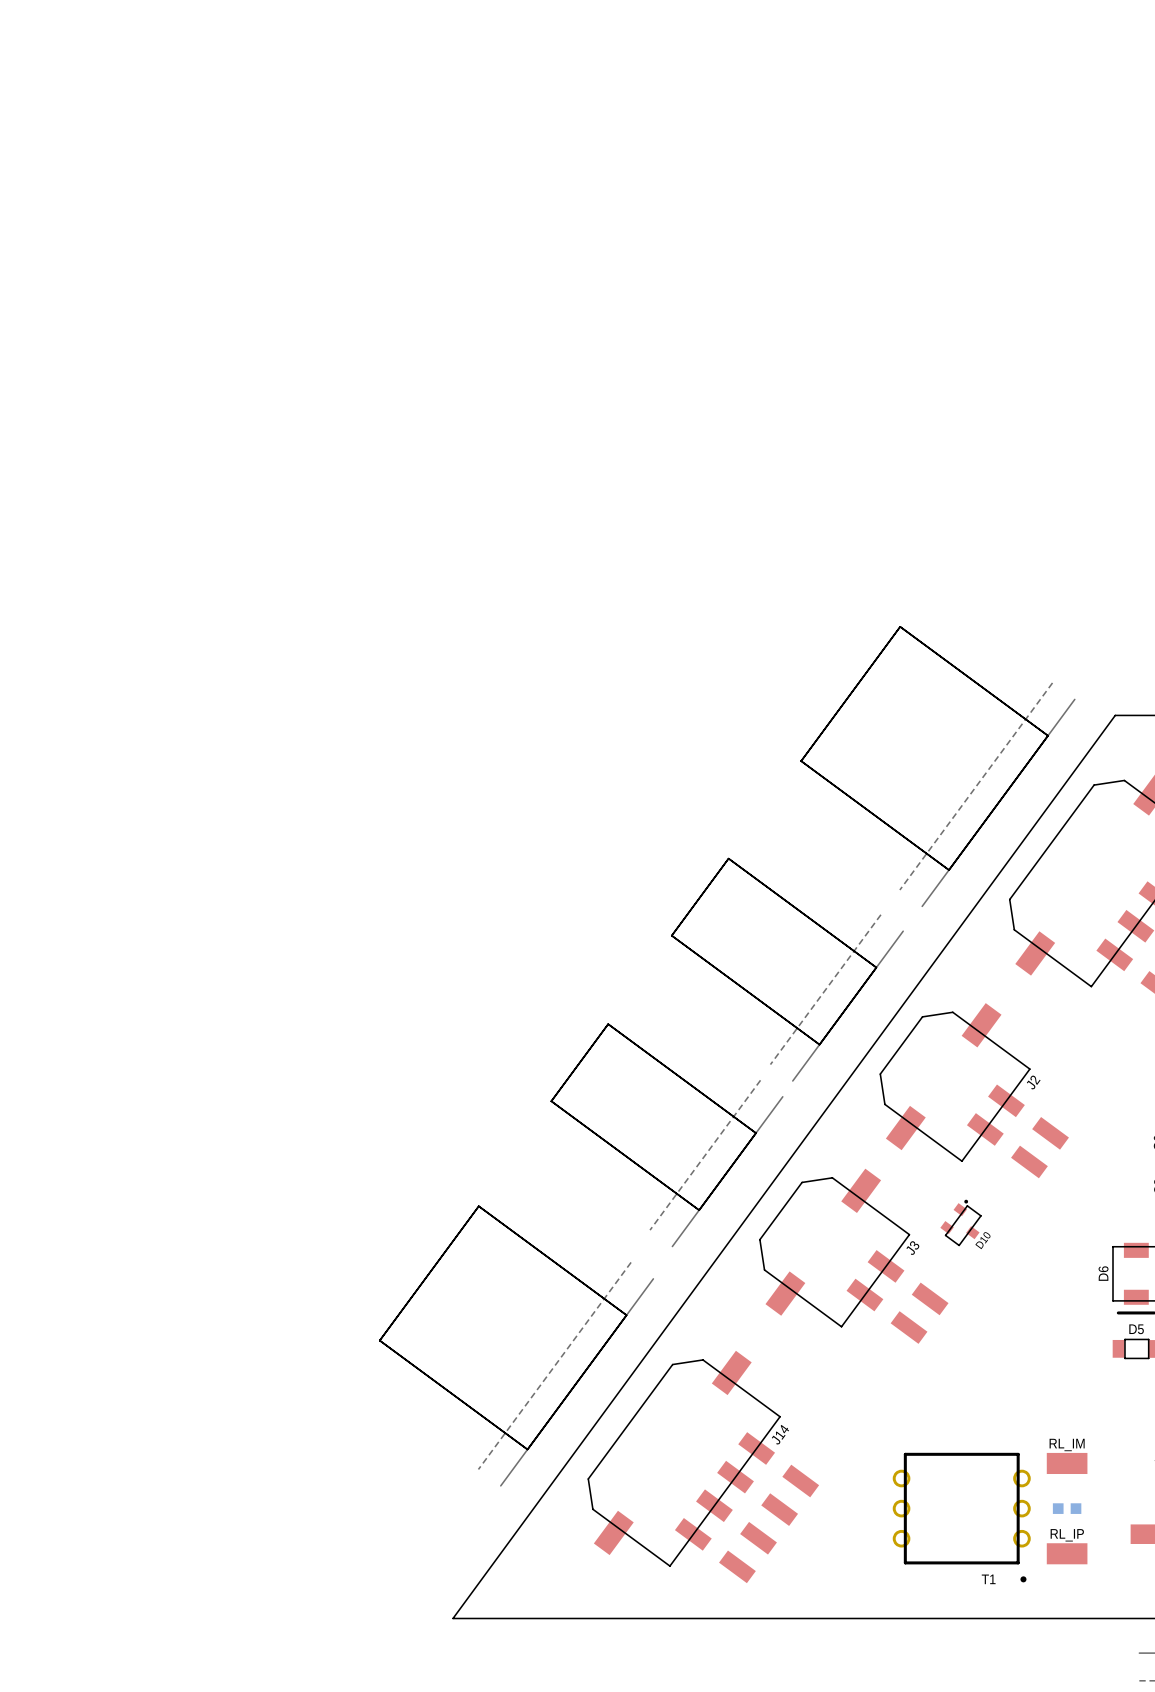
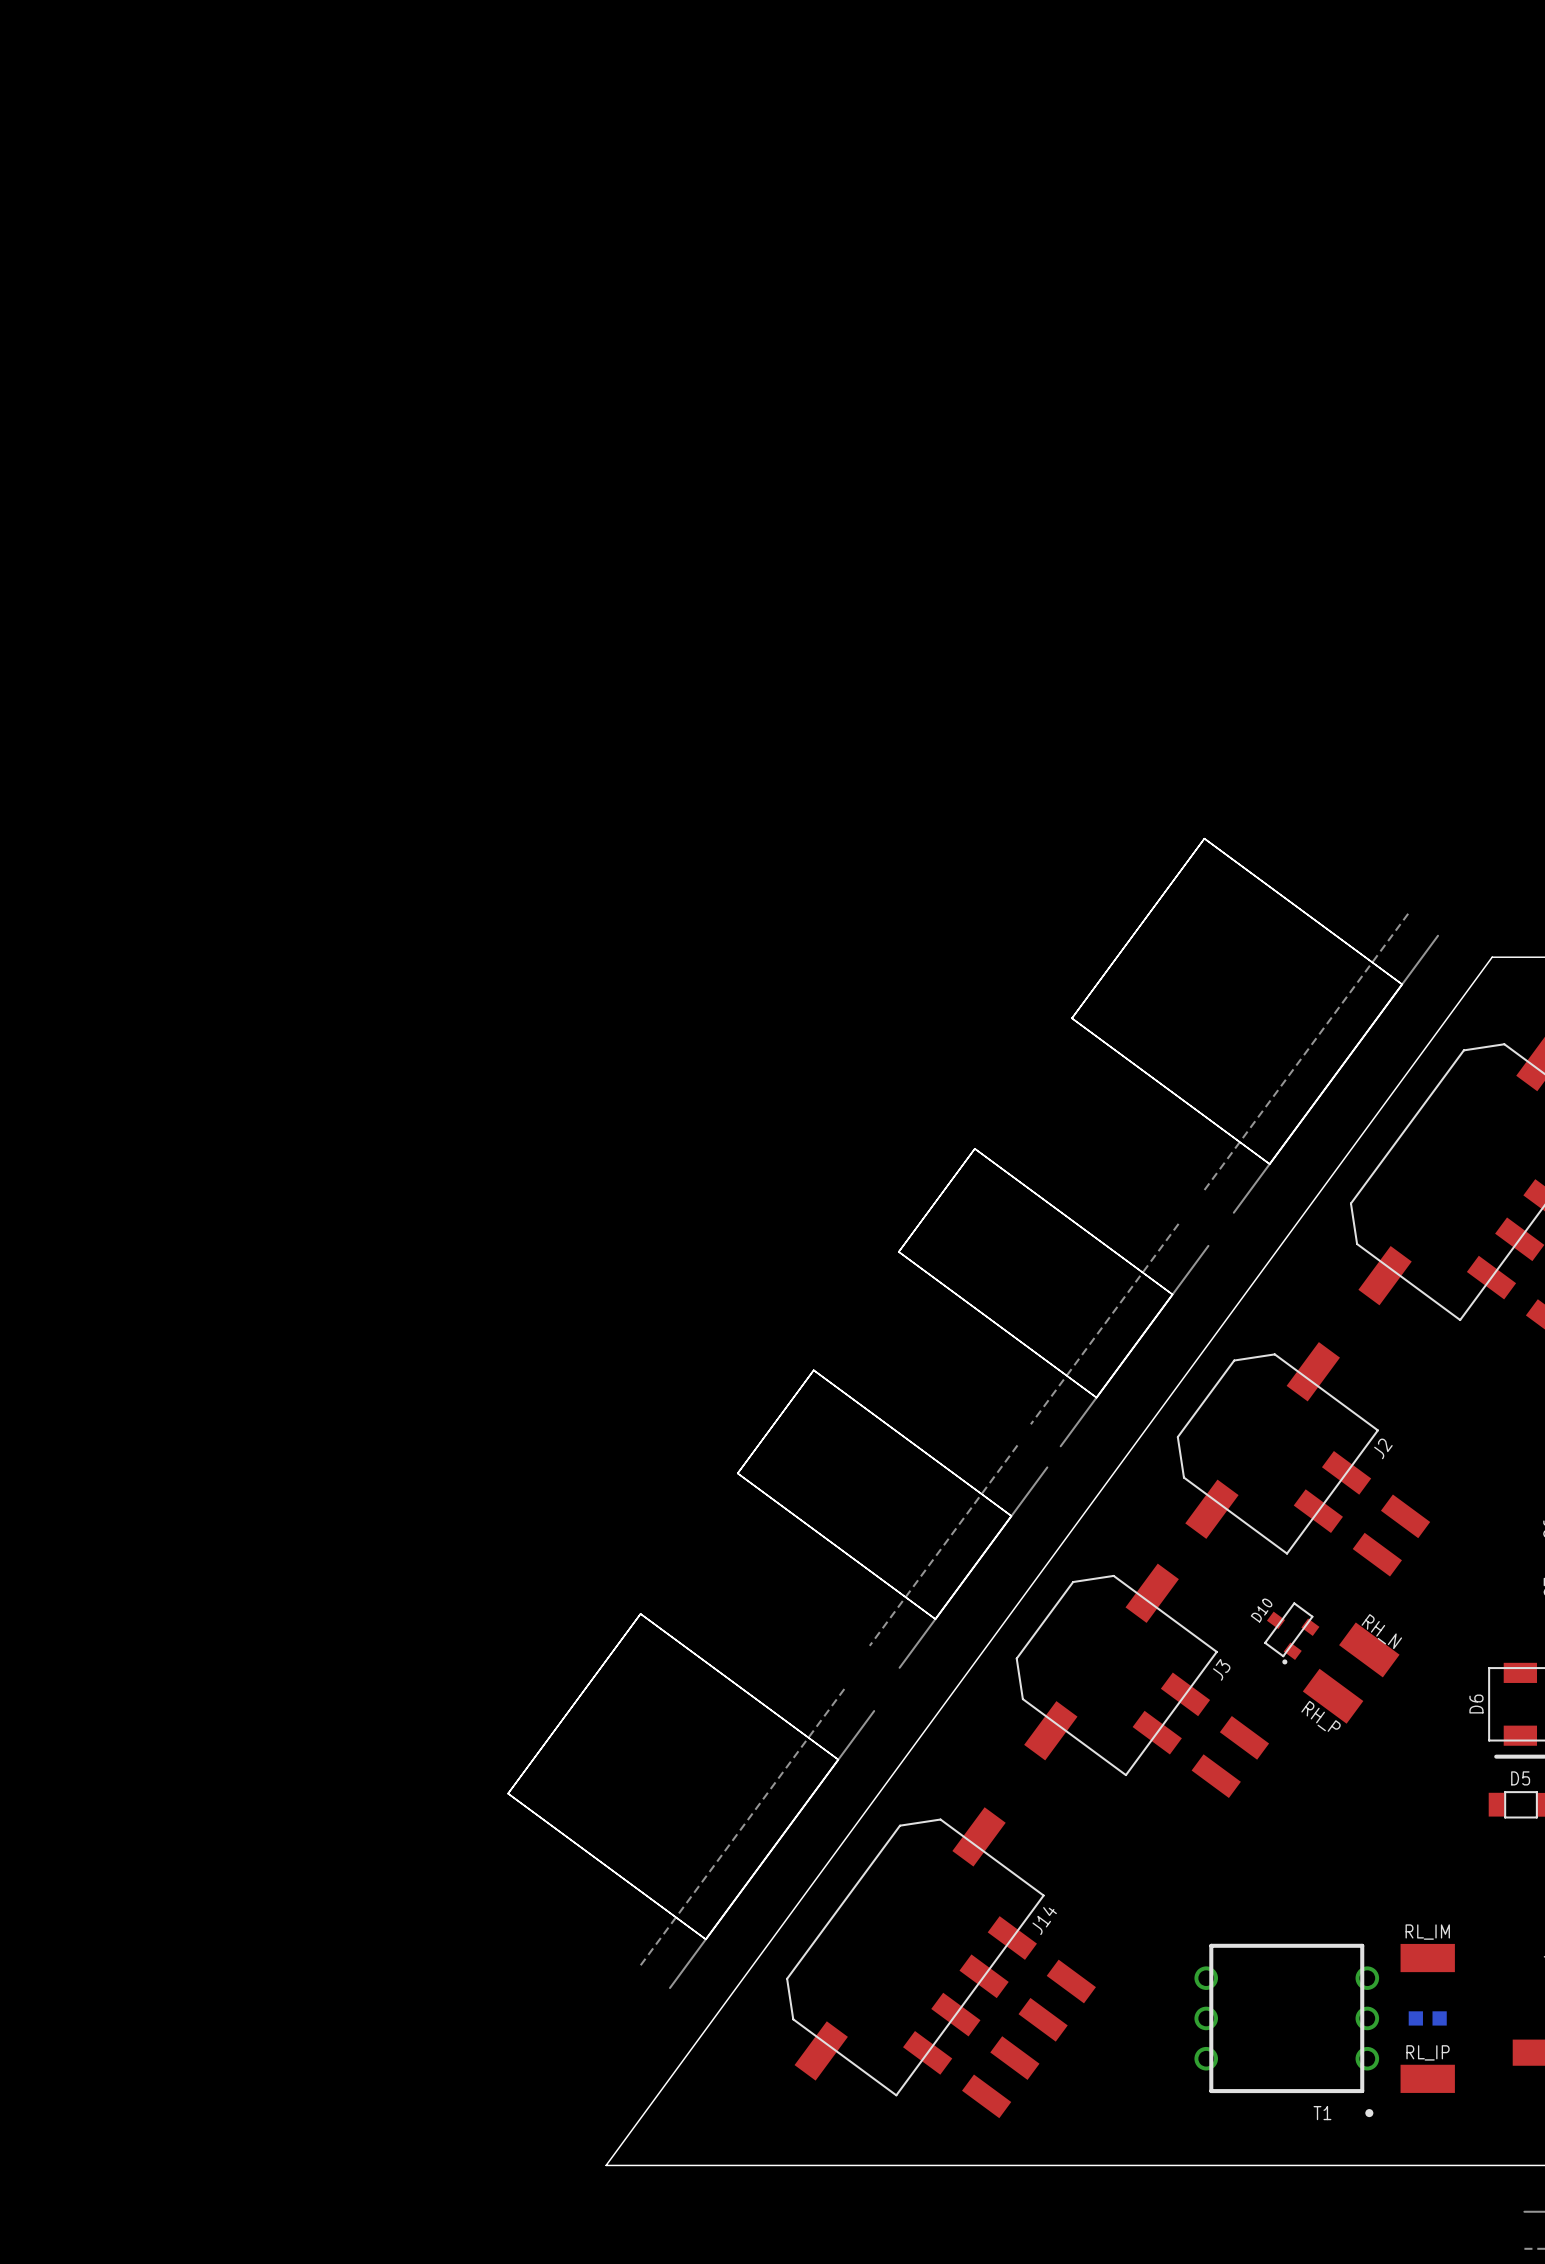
D10 rotation: 0° (961, 1222) -> 180° (1291, 1633)
RH_N: none -> (1369, 1649)
RH_P: none -> (1333, 1696)

